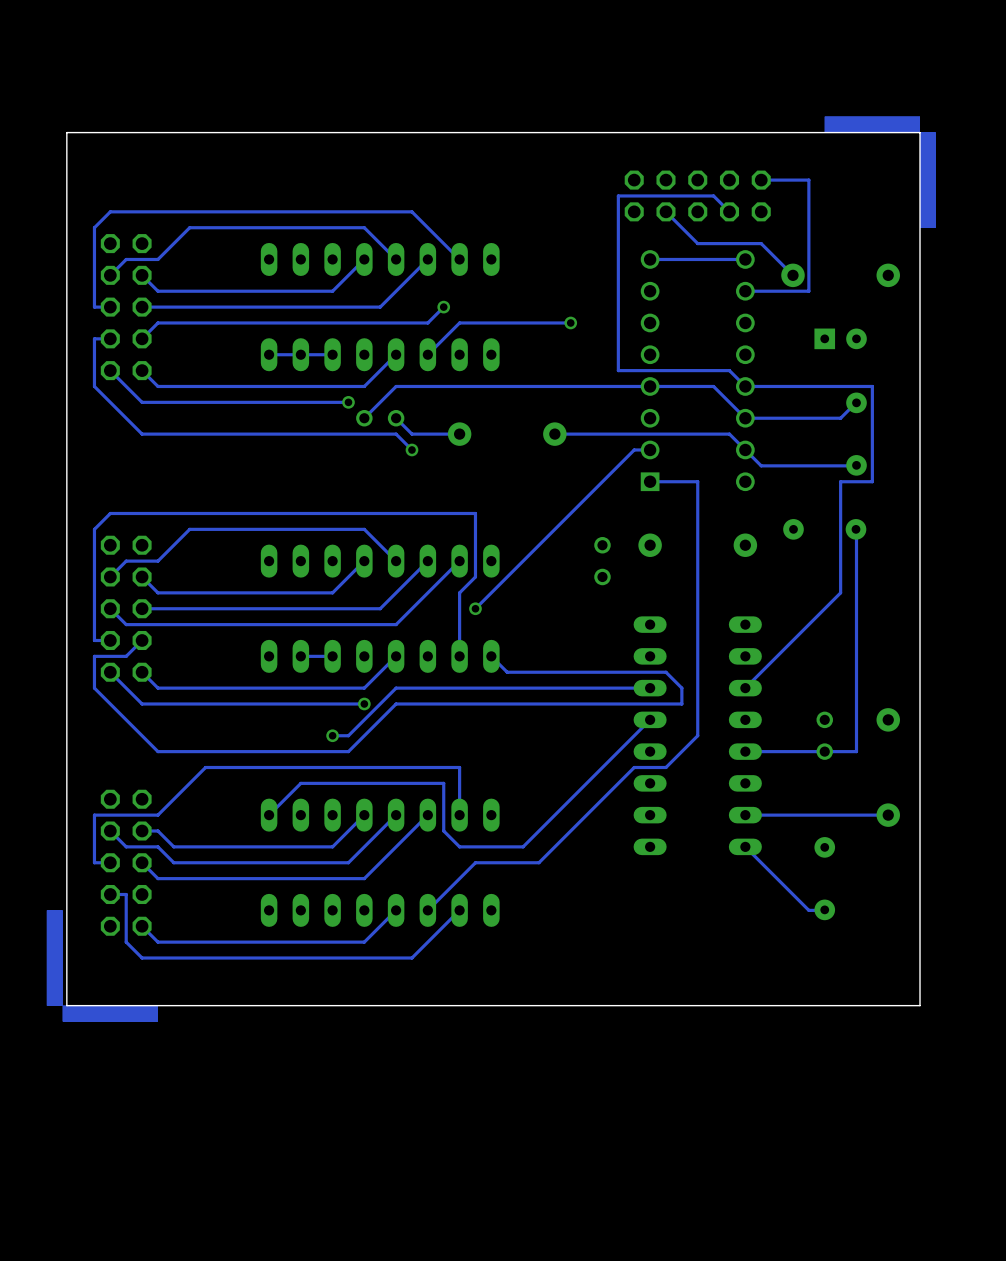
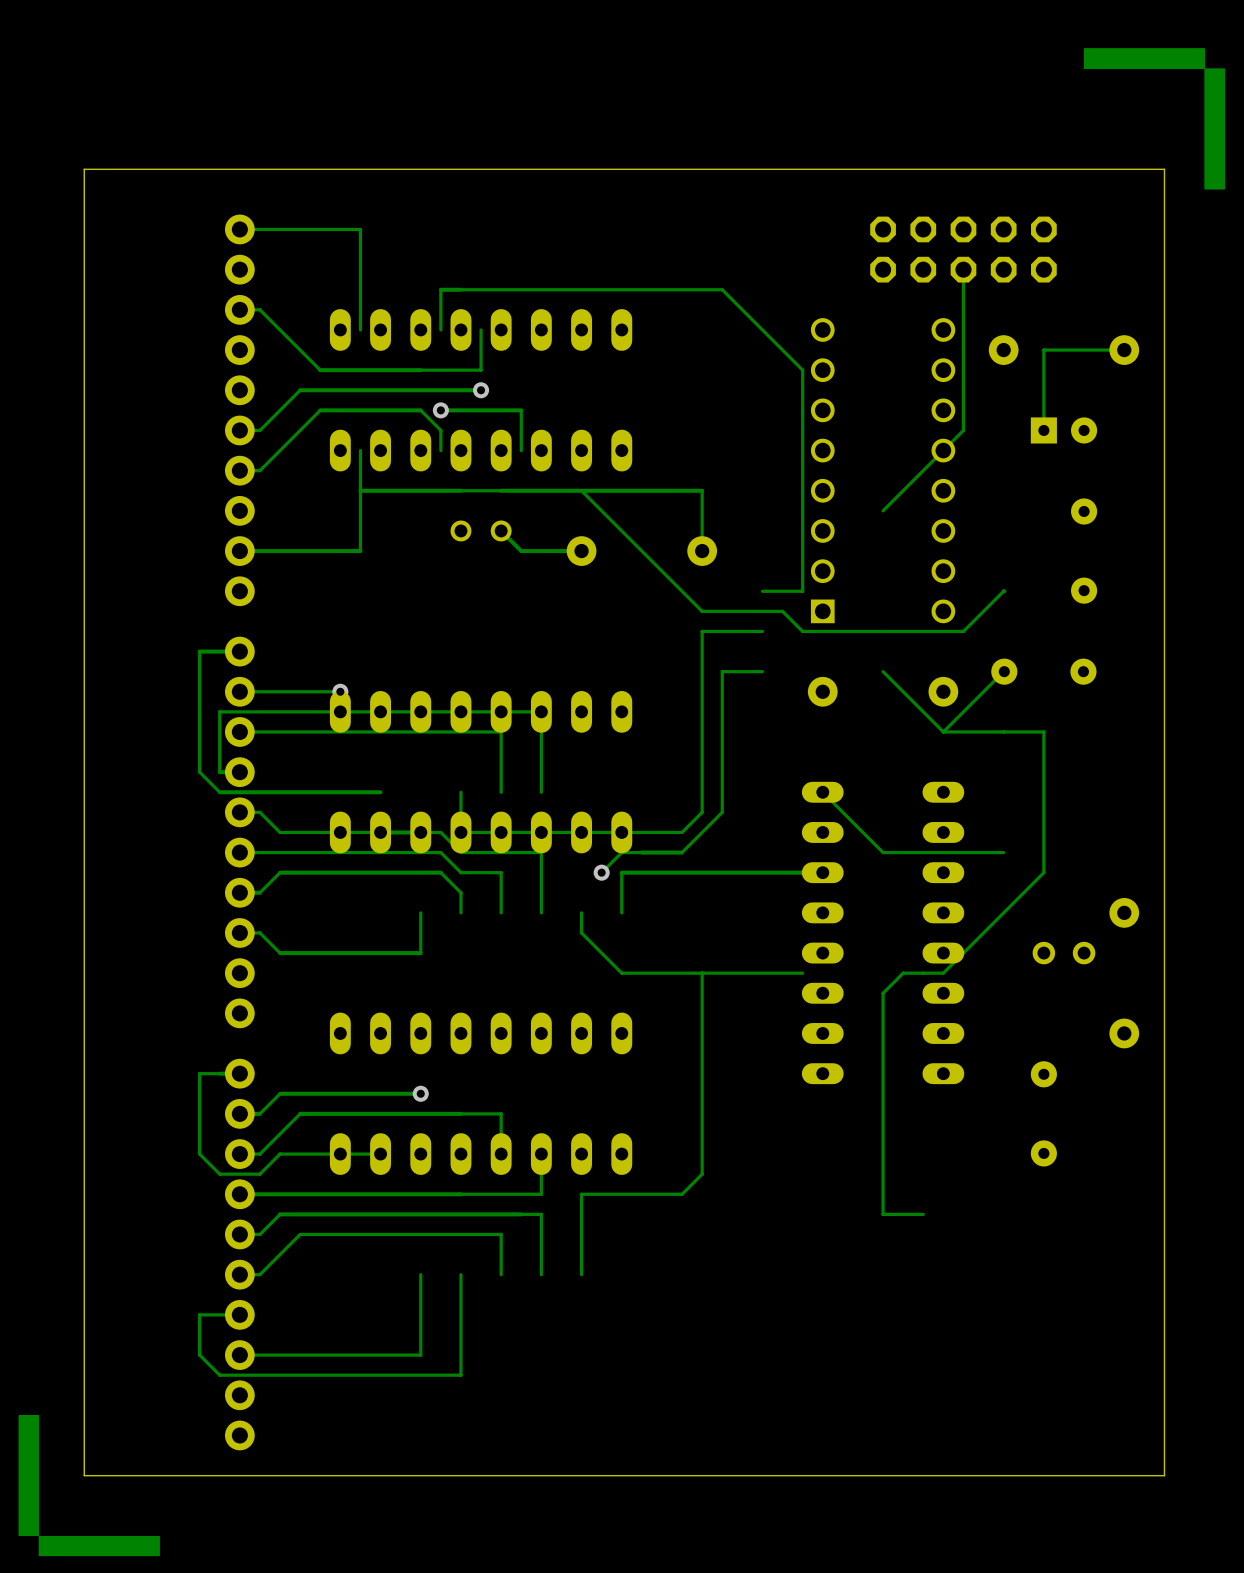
drawing position: (880, 172) -> (1154, 118)
track: none -> (239, 229) (360, 229) (360, 329)
track: (761, 180) (808, 180) (808, 291) (745, 291) -> none
part: (697, 195) -> none
part: none -> (963, 249)
track: (665, 211) (697, 243) (761, 243) (792, 275) -> none
track: (729, 211) (713, 195) (618, 195) (618, 370) (729, 370) (745, 386) (872, 386) (872, 481) (840, 481) (840, 592) (745, 688) -> none
track: none -> (963, 269) (963, 430) (883, 510)
track: (348, 227) (189, 227) (157, 259) (126, 259) (110, 275) -> (440, 289) (440, 329)
track: (364, 227) (396, 259) -> (460, 289) (722, 289) (802, 370) (802, 591) (762, 591)
track: (364, 259) (332, 291) -> (481, 329) (481, 370) (420, 370)
track: (427, 259) (380, 307) -> none
track: (459, 259) (411, 211) (110, 211) (94, 227) (94, 307) (110, 307) -> none
track: (745, 259) (650, 259) -> none
track: (142, 275) (157, 291) (253, 291) -> (239, 309) (259, 309) (320, 370)
track: none -> (1124, 350) (1043, 350) (1043, 430)
part: (126, 307) -> none
track: (237, 307) (142, 307) -> (300, 390) (259, 430) (239, 430)
via: none -> (481, 390)
track: (443, 307) (427, 322) (411, 322) -> (521, 450) (521, 410)
via: (443, 307) -> none
part: none -> (239, 410)
track: (253, 322) (157, 322) (142, 338) -> (320, 410) (259, 470) (239, 470)
track: (348, 322) (332, 322) -> (440, 450) (440, 430) (420, 410)
via: none -> (440, 410)
track: (570, 322) (459, 322) (427, 354) -> none
via: (570, 322) -> none
track: (110, 338) (94, 338) (94, 386) (142, 434) (189, 434) -> none
track: (332, 354) (269, 354) -> none
track: (396, 354) (364, 386) -> (501, 490) (460, 490)
track: (110, 370) (142, 402) (348, 402) -> none
track: (142, 370) (157, 386) (284, 386) -> none
track: (396, 386) (364, 418) -> none
track: (554, 386) (713, 386) (745, 418) (840, 418) (856, 402) -> none
via: (348, 402) -> none
track: (284, 434) (396, 434) (411, 449) -> (360, 551) (360, 450)
track: (554, 434) (729, 434) (761, 465) (792, 465) -> (702, 551) (702, 490)
via: (411, 449) -> none
track: (650, 449) (634, 449) (475, 608) -> none
track: (856, 465) (793, 465) -> (581, 490) (702, 611) (782, 611) (802, 631) (963, 631) (1004, 591)
track: (650, 481) (697, 481) (697, 735) (665, 767) (634, 767) (538, 862) (475, 862) (427, 910) -> none
track: none -> (762, 631) (702, 631) (702, 812) (682, 832) (460, 832) (460, 792)
track: (157, 513) (110, 513) (94, 529) (94, 640) (110, 640) -> (199, 651) (199, 772) (219, 792)
track: (189, 513) (475, 513) (475, 576) (459, 592) (459, 656) -> none
track: none -> (762, 671) (722, 671) (722, 812) (682, 852)
track: none -> (883, 671) (943, 731)
track: none -> (1004, 671) (943, 731)
track: (856, 529) (856, 751) (745, 751) -> none
track: none -> (340, 691) (239, 691)
via: none -> (340, 691)
track: (364, 561) (332, 592) (157, 592) (142, 576) -> none
track: (396, 561) (364, 529) (189, 529) (157, 561) (126, 561) (110, 576) -> none
track: (427, 561) (380, 608) (189, 608) -> none
track: (459, 561) (396, 624) (300, 624) -> none
part: (602, 561) -> none
track: none -> (239, 731) (501, 731) (501, 792)
track: none -> (943, 731) (1043, 731) (1043, 872) (943, 973) (903, 973) (883, 993) (883, 1214) (923, 1214)
track: (110, 608) (126, 624) (173, 624) -> none
part: (126, 608) -> none
track: (173, 608) (142, 608) -> (219, 772) (219, 711) (541, 711) (541, 792)
via: (475, 608) -> none
track: none -> (822, 792) (883, 852) (1003, 852)
track: (142, 640) (126, 656) (94, 656) (94, 688) (157, 751) (221, 751) -> (239, 932) (259, 932) (280, 953)
track: none -> (239, 812) (259, 812) (280, 832) (380, 832)
part: none -> (239, 832)
track: none -> (420, 832) (440, 832) (460, 852) (541, 852) (541, 912)
track: (396, 656) (364, 688) (348, 688) -> (460, 912) (460, 892) (440, 872)
track: (491, 656) (507, 672) -> (601, 872) (621, 852) (641, 852)
track: (110, 672) (142, 703) (189, 703) -> none
track: (142, 672) (157, 688) (221, 688) -> (259, 892) (280, 872)
track: none -> (239, 852) (440, 852) (460, 872) (501, 872) (501, 912)
track: (538, 672) (665, 672) (681, 688) (681, 703) (396, 703) (348, 751) (332, 751) -> (420, 912) (420, 953)
via: none -> (601, 872)
track: (491, 688) (396, 688) (348, 735) (332, 735) -> (621, 872) (621, 912)
track: (364, 703) (205, 703) -> none
via: (364, 703) -> none
track: none -> (581, 912) (581, 932) (621, 973) (802, 973)
track: (650, 719) (523, 846) (459, 846) (443, 831) (443, 783) (300, 783) (269, 815) -> none
via: (332, 735) -> none
part: (824, 735) -> none
part: none -> (1063, 953)
track: none -> (702, 973) (702, 1174) (682, 1194) (581, 1194) (581, 1274)
track: (364, 815) (332, 846) (189, 846) -> none
track: (396, 815) (348, 862) (332, 862) -> none
track: (427, 815) (364, 878) -> (501, 1154) (501, 1113) (460, 1113)
track: (459, 815) (459, 767) (205, 767) (157, 815) (94, 815) (94, 862) (110, 862) -> none
track: (888, 815) (745, 815) -> none
track: (110, 831) (126, 846) (157, 846) (173, 862) (221, 862) -> none
track: (142, 831) (157, 831) (173, 846) -> (380, 1154) (280, 1154) (259, 1174) (219, 1174) (199, 1154) (199, 1073) (219, 1073)
track: (745, 846) (808, 910) (824, 909) -> none
part: (126, 862) -> none
track: (142, 862) (157, 878) (189, 878) -> none
via: none -> (420, 1093)
track: (237, 878) (205, 878) -> (280, 1093) (259, 1113)
track: none -> (300, 1113) (259, 1154) (239, 1154)
track: (110, 894) (126, 894) (126, 942) (142, 958) (221, 958) -> (239, 1234) (259, 1234) (280, 1214)
track: (396, 910) (364, 942) -> (541, 1154) (541, 1194) (460, 1194)
track: (459, 910) (411, 958) -> (541, 1274) (541, 1214) (521, 1214)
track: (142, 926) (157, 942) (189, 942) -> none
drawing position: (102, 965) -> (89, 1485)
part: none -> (239, 1254)
track: none -> (420, 1274) (420, 1355) (239, 1355)
track: none -> (460, 1274) (460, 1375) (219, 1375) (199, 1355) (199, 1314) (239, 1314)
track: none -> (501, 1274) (501, 1234) (300, 1234) (259, 1274) (239, 1274)
board edge: (920, 1005) (66, 1005) -> (1164, 1274) (1164, 1475) (84, 1475) (84, 1274)

